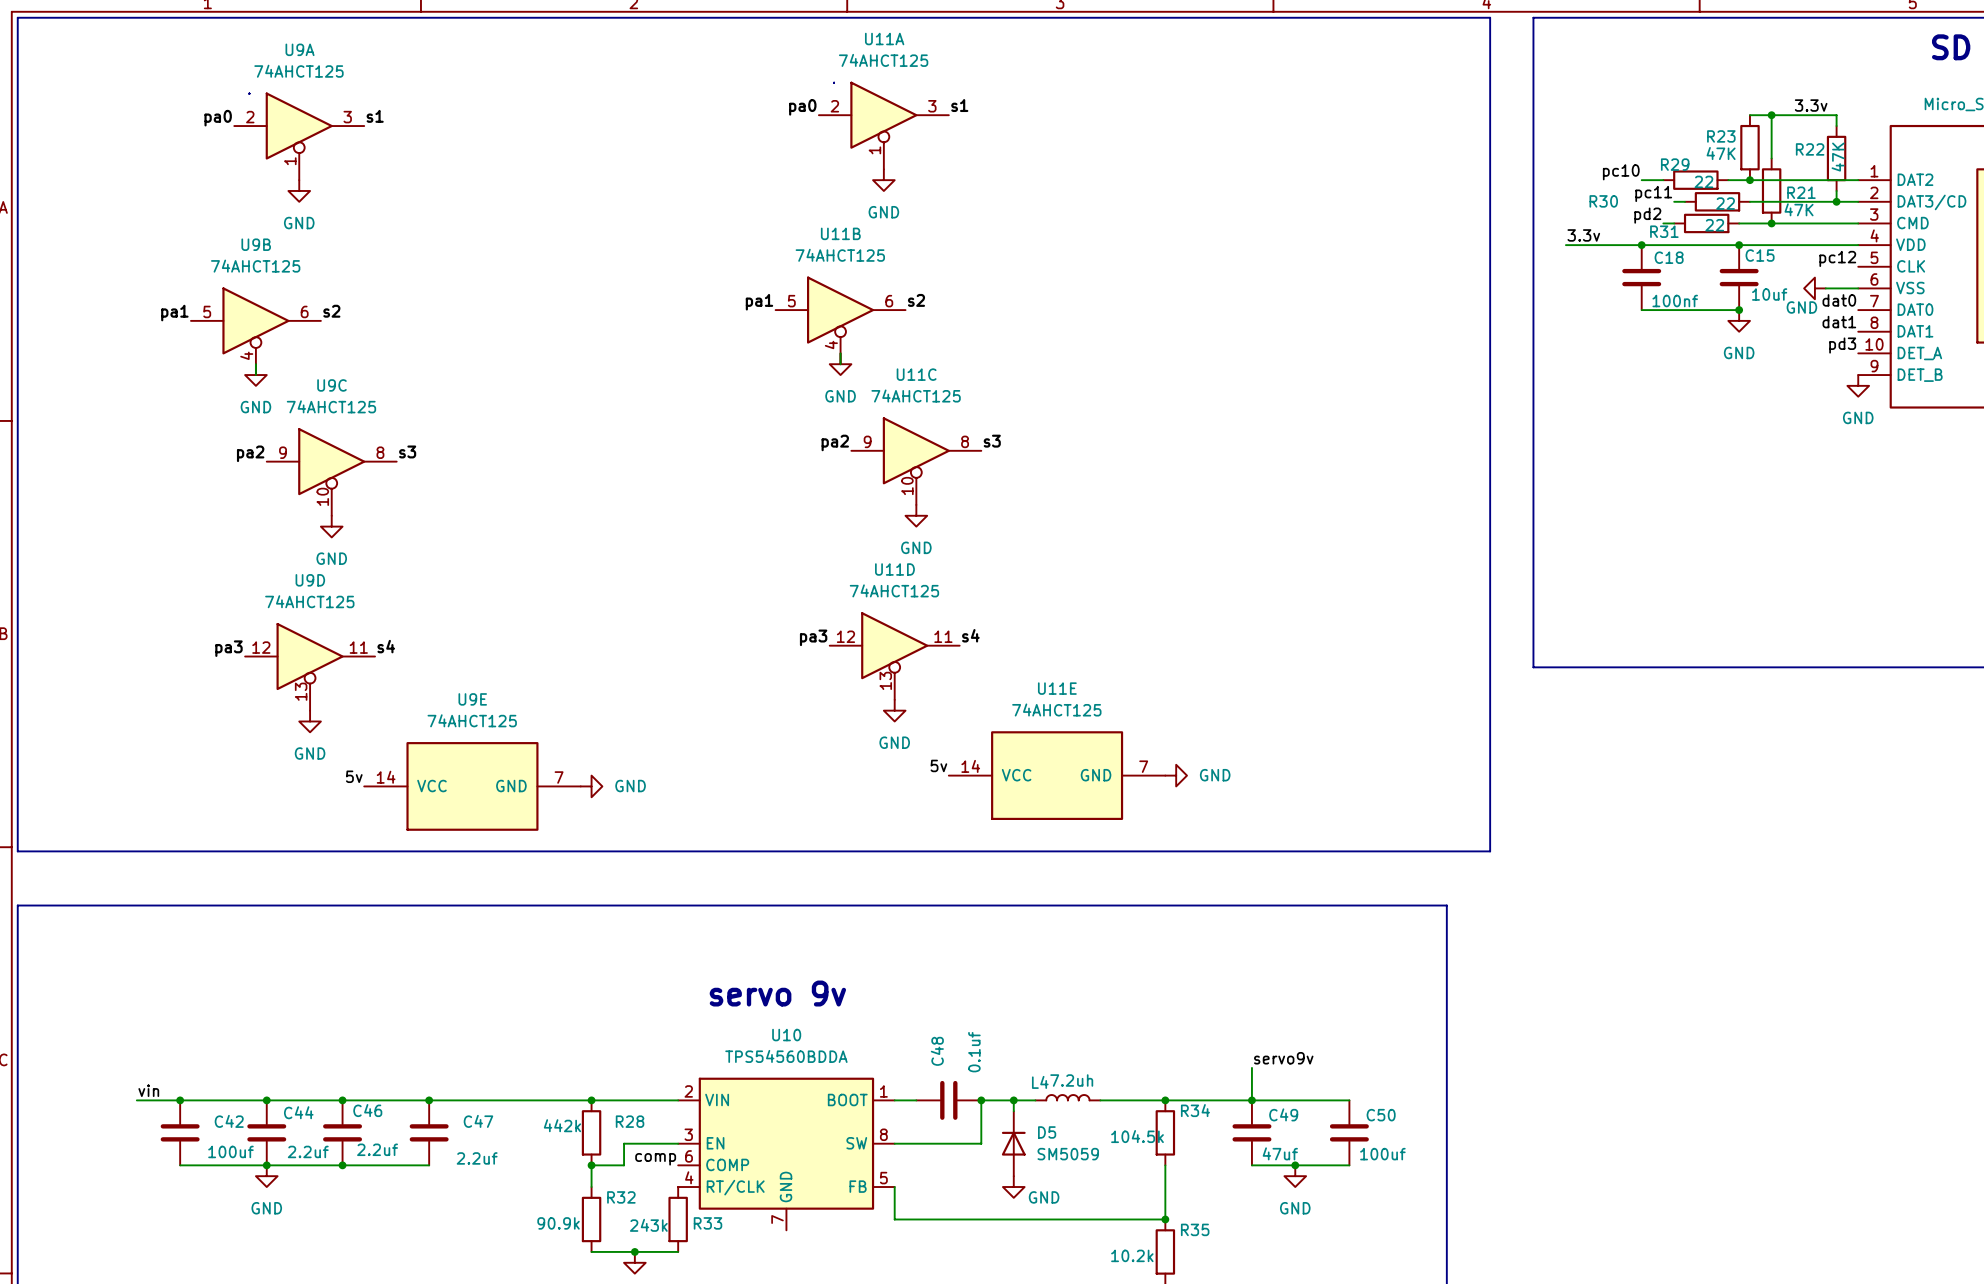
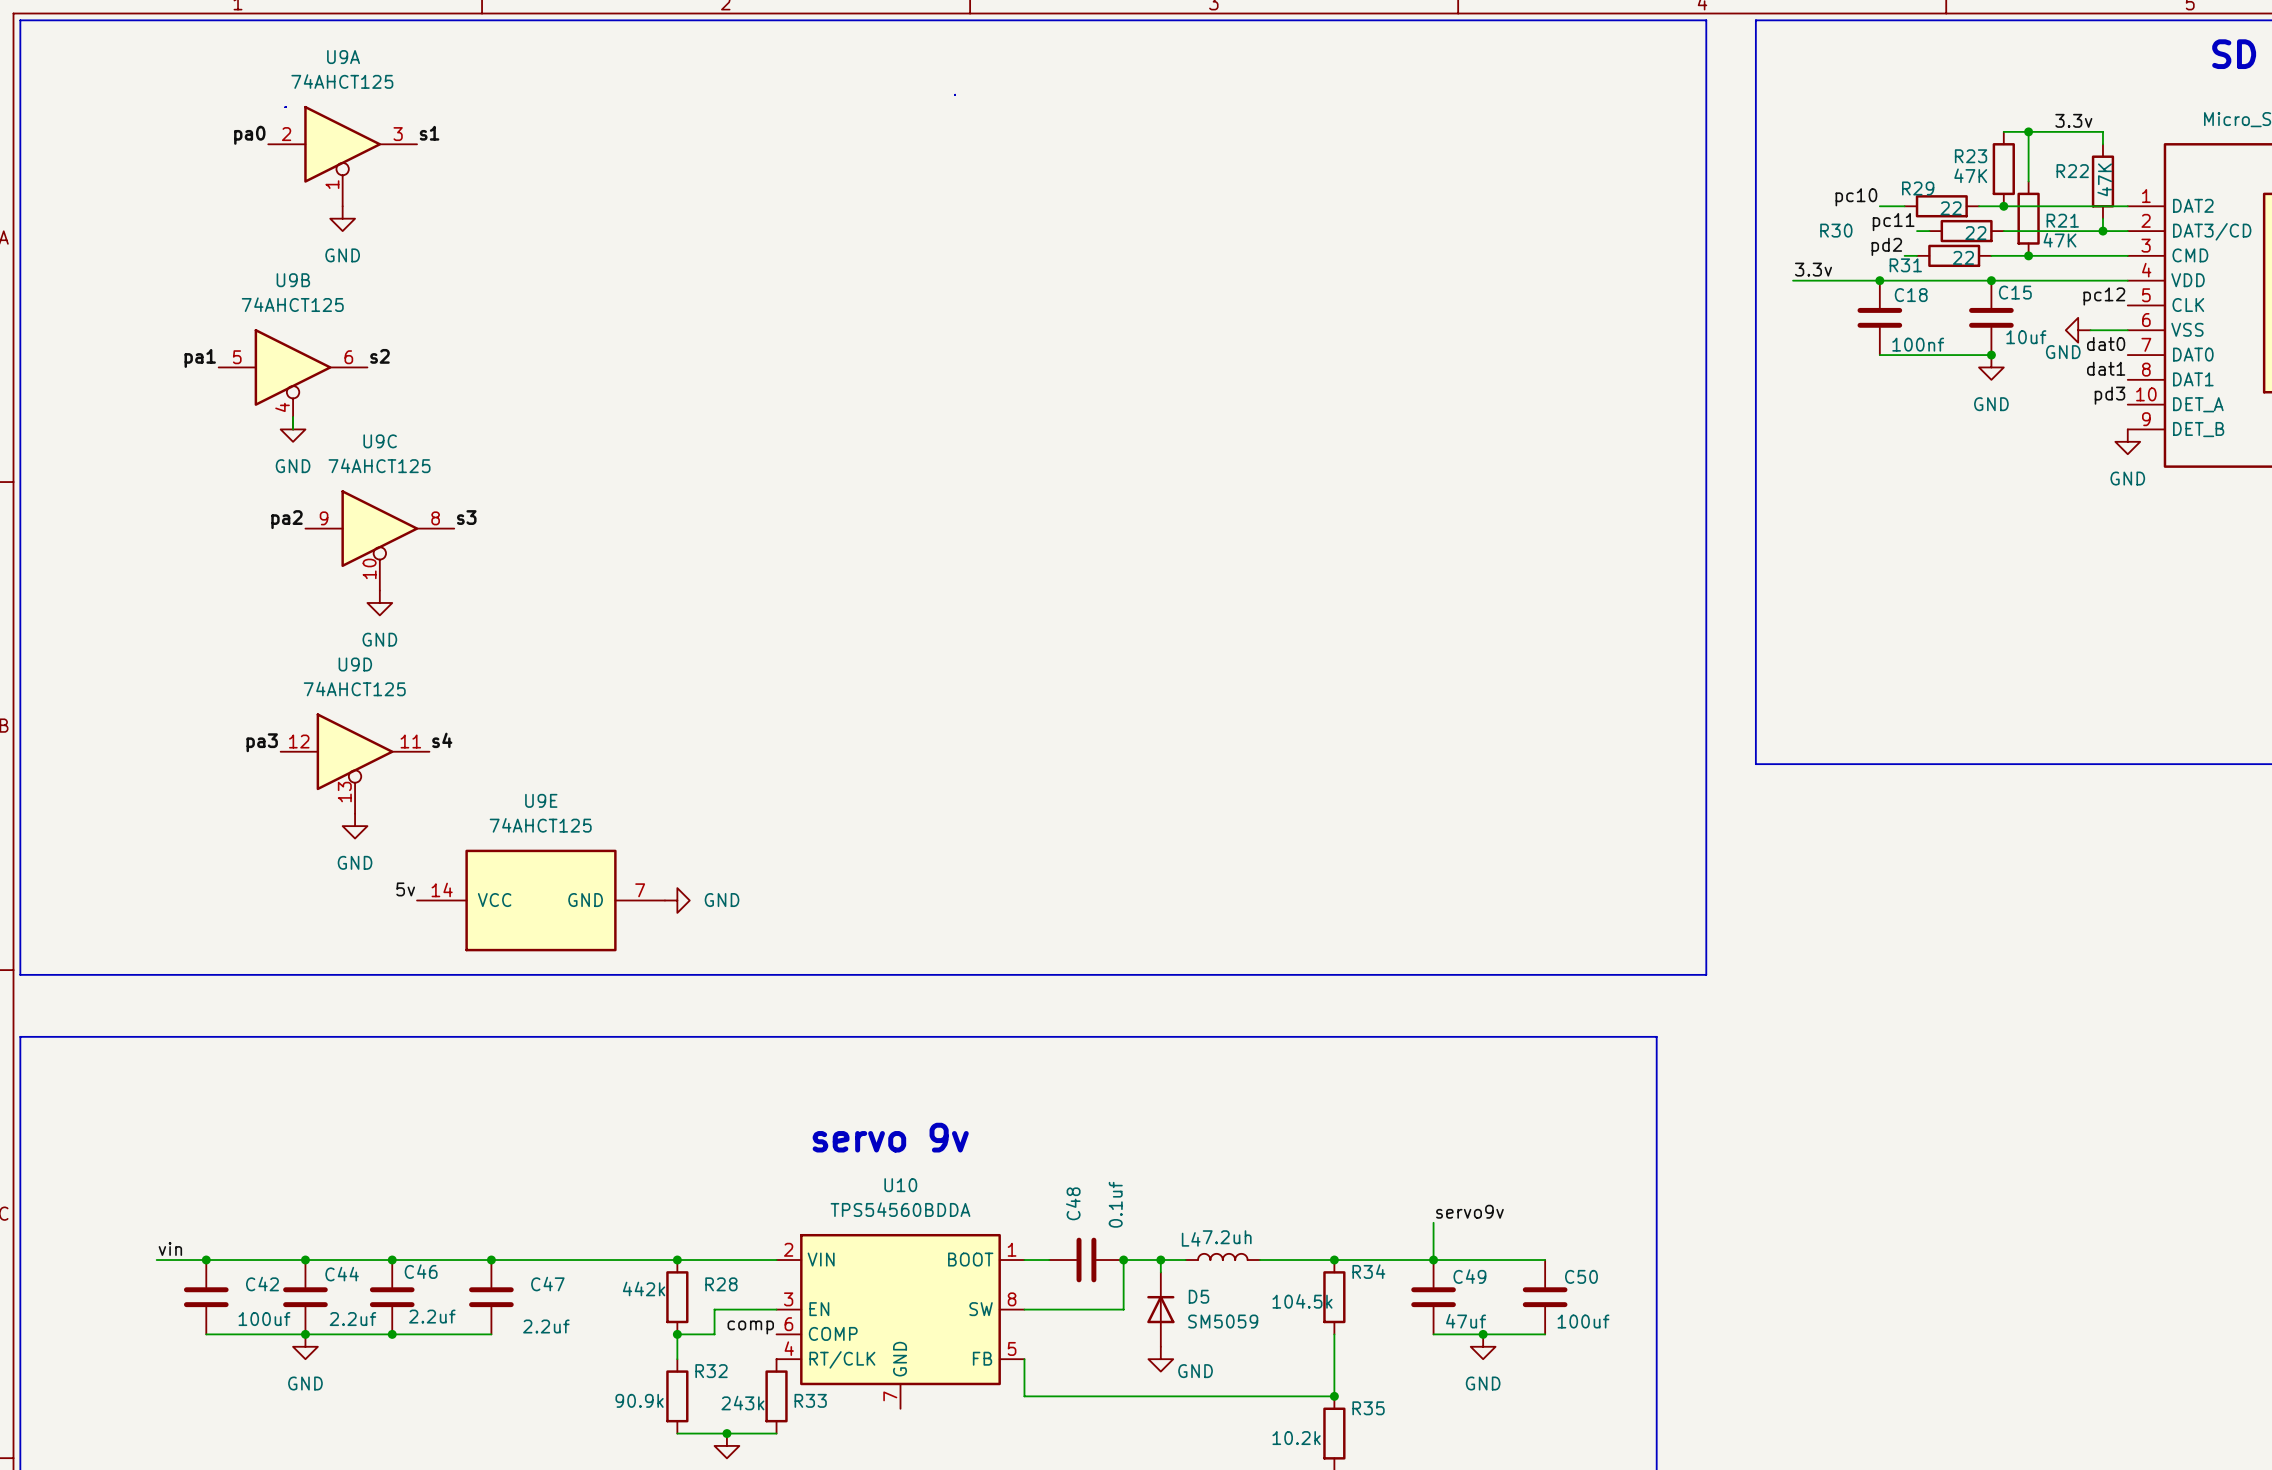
label: s1 (959, 105) -> none
label: pa0 (802, 107) -> none
U11A: 74AHCT125 (883, 125) -> none
power symbol: GND (883, 180) -> none
label: s2 (916, 300) -> none
label: pa1 (759, 302) -> none
U11B: 74AHCT125 (840, 320) -> none
wire: (840, 353) (840, 364) -> none
power symbol: GND (840, 364) -> none
label: s3 (992, 441) -> none
label: pa2 (835, 442) -> none
U11C: 74AHCT125 (916, 461) -> none
power symbol: GND (916, 515) -> none
label: s4 (970, 635) -> none
label: pa3 (813, 637) -> none
U11D: 74AHCT125 (894, 655) -> none
power symbol: GND (894, 710) -> none
label: 5v (938, 765) -> none
U11E: 74AHCT125 (1057, 775) -> none
power symbol: GND (1176, 775) -> none

